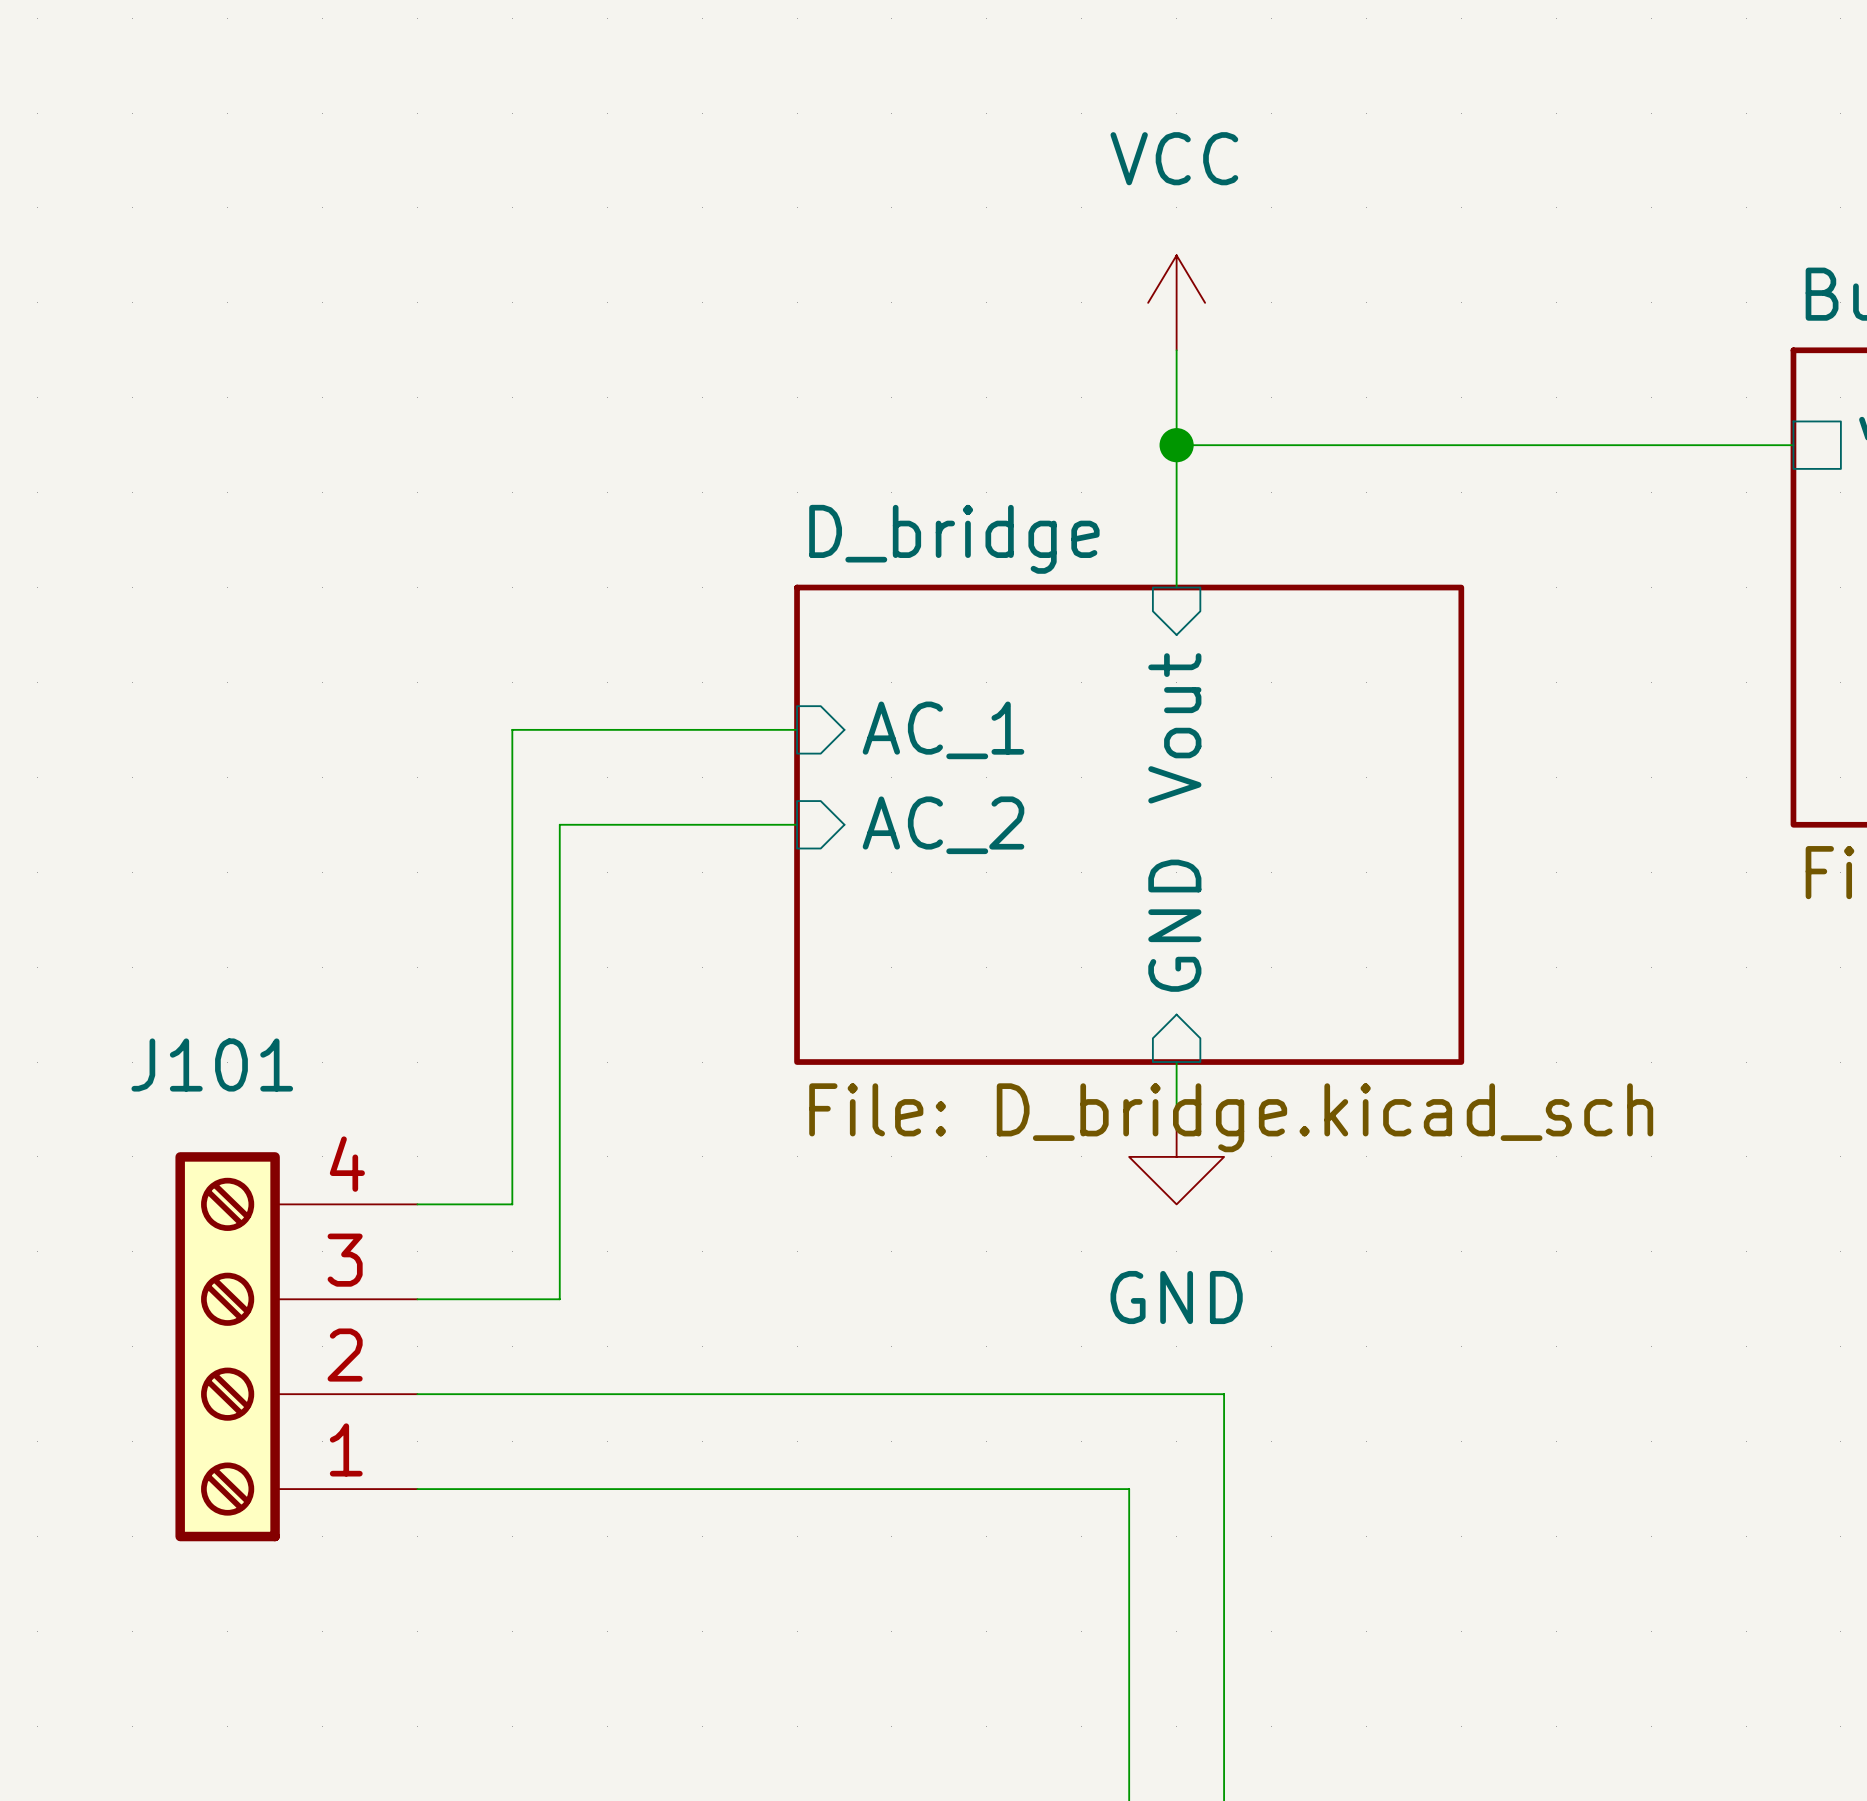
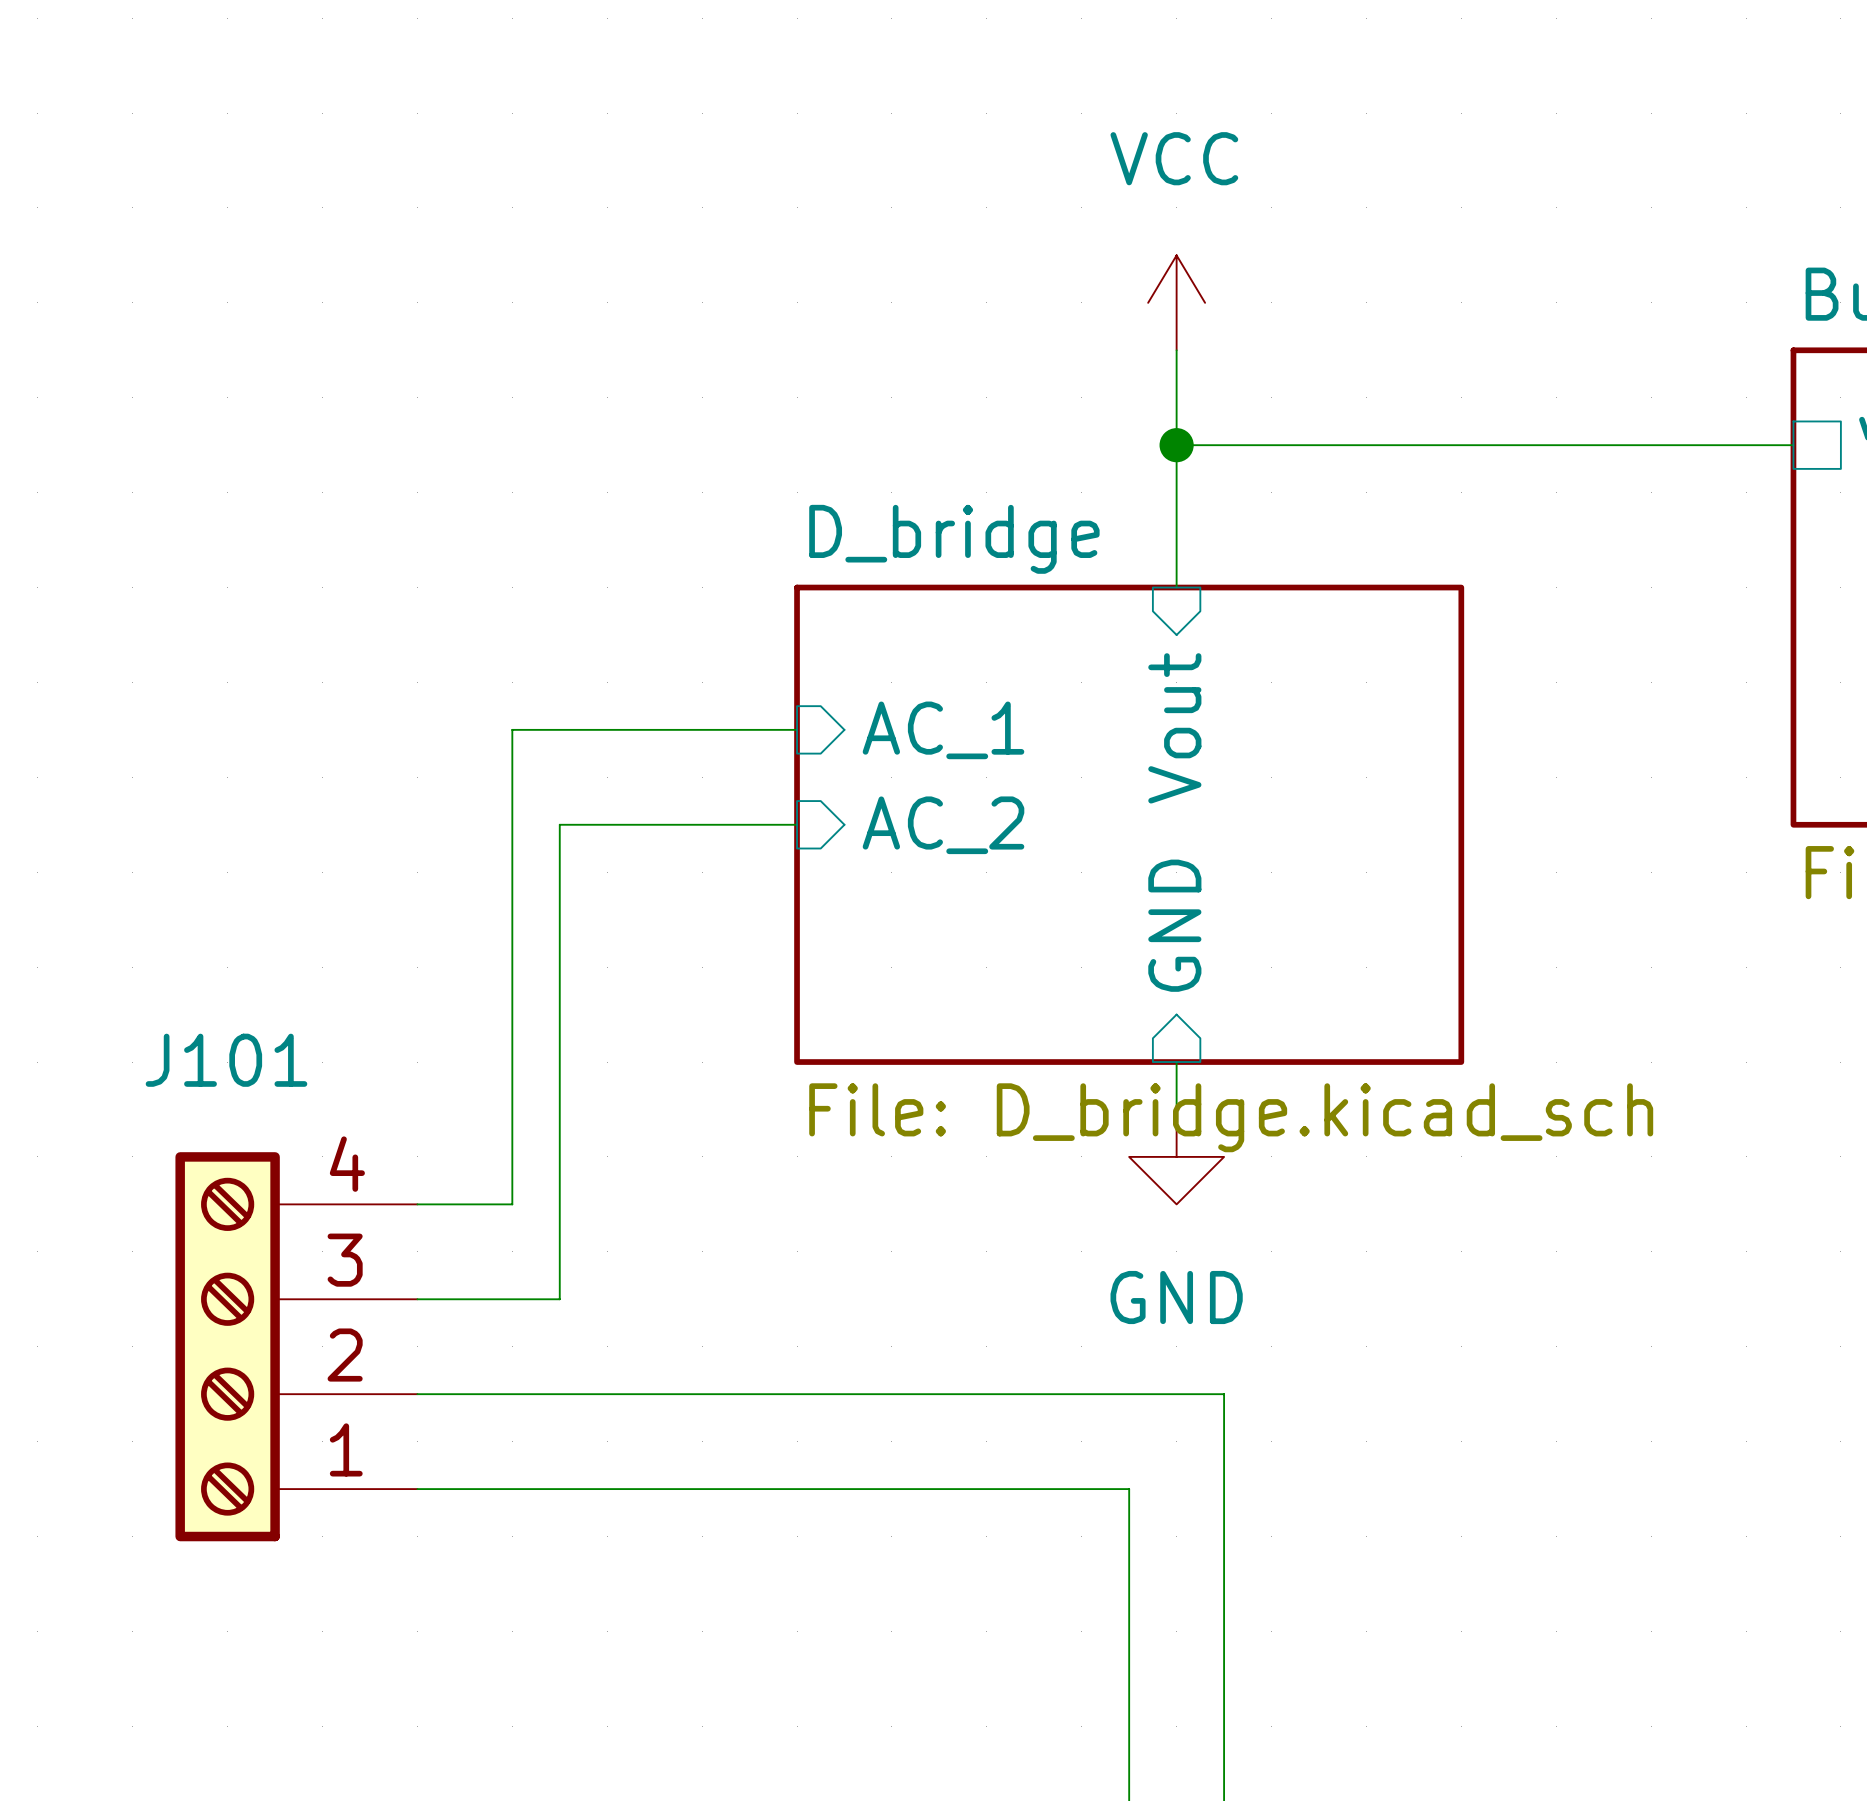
J101 name position: J101 (212, 1065) -> J101 (226, 1060)

